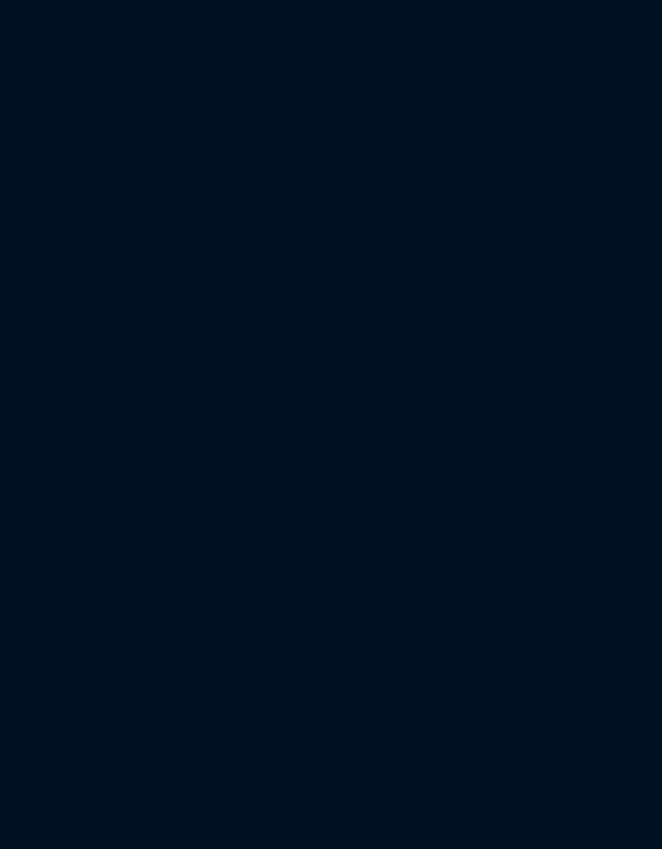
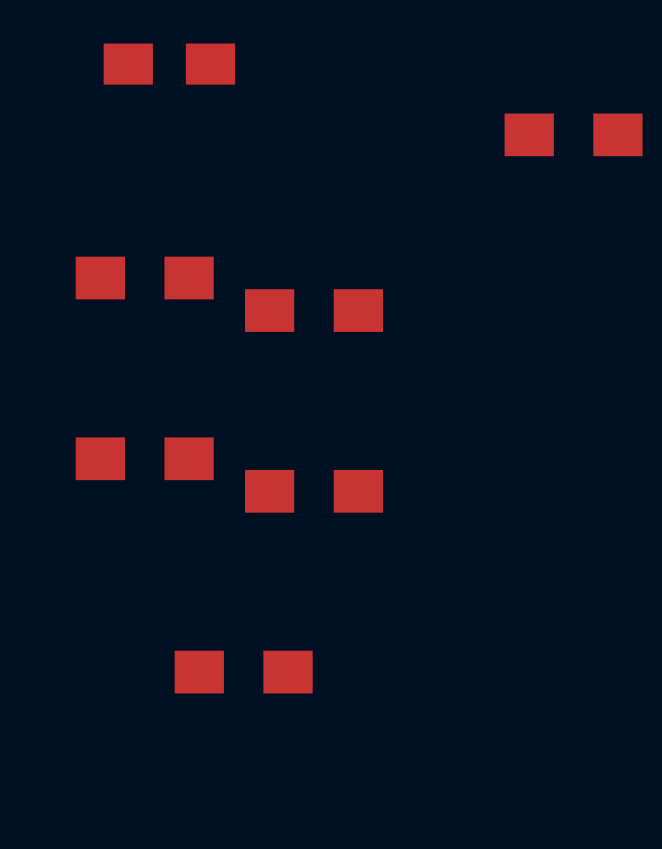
part: none -> (169, 64)
part: none -> (573, 134)
part: none -> (144, 278)
part: none -> (313, 310)
part: none -> (144, 458)
part: none -> (313, 491)
part: none -> (243, 672)

